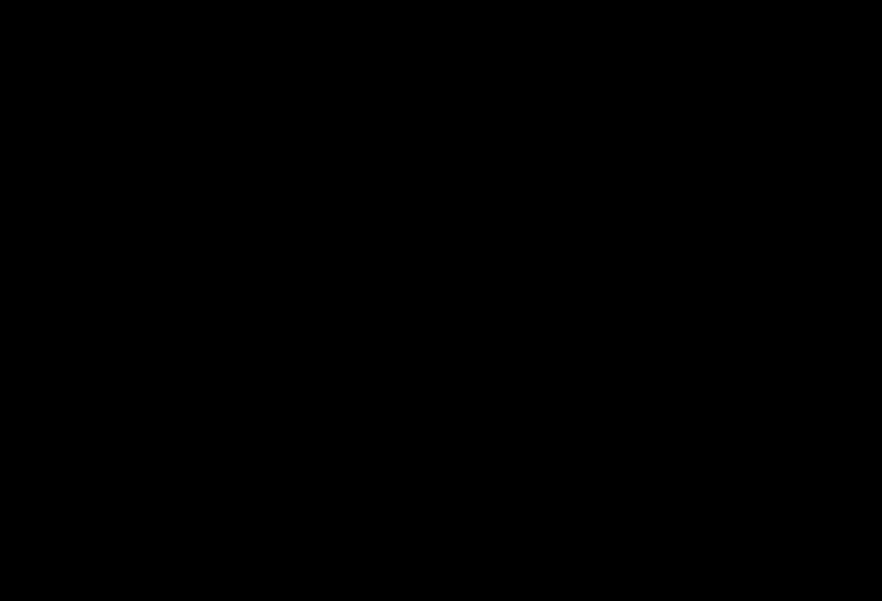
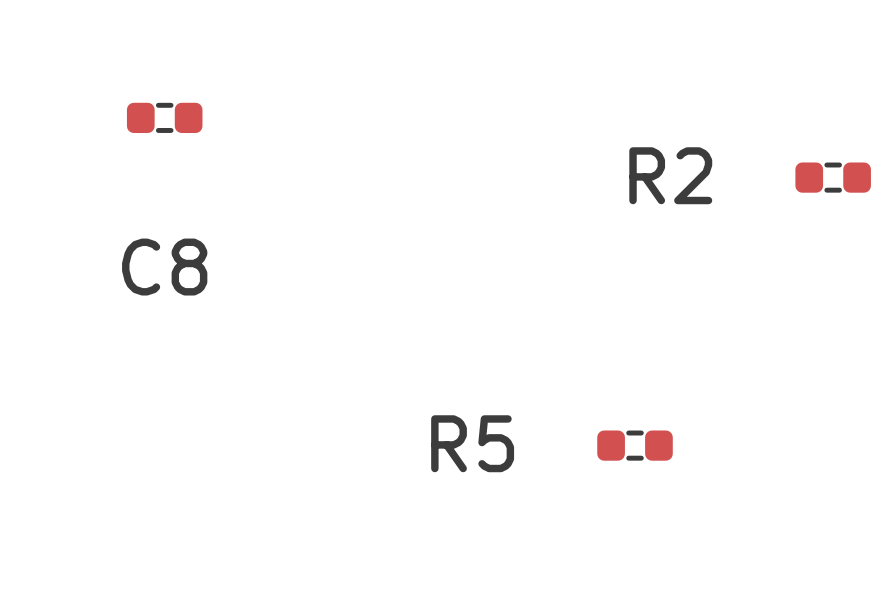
C8: none -> (164, 117)
R2: none -> (833, 177)
R5: none -> (635, 445)

